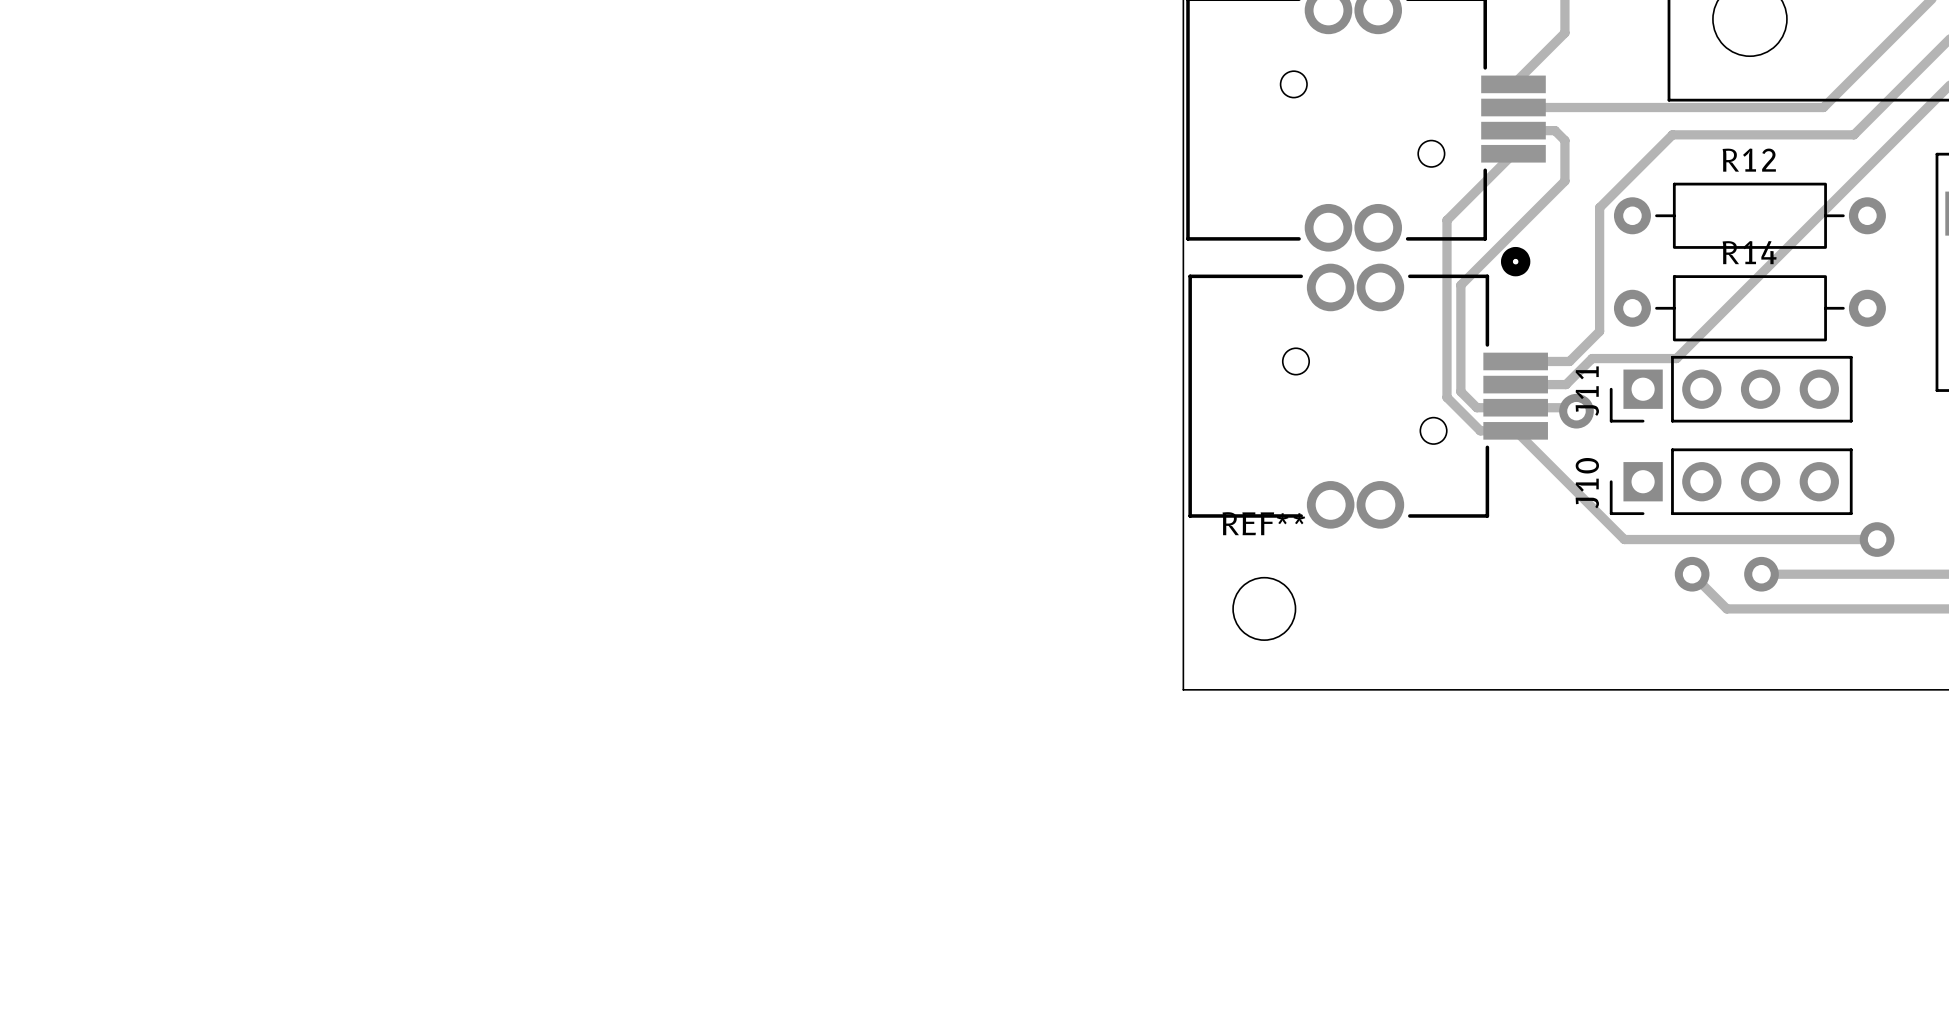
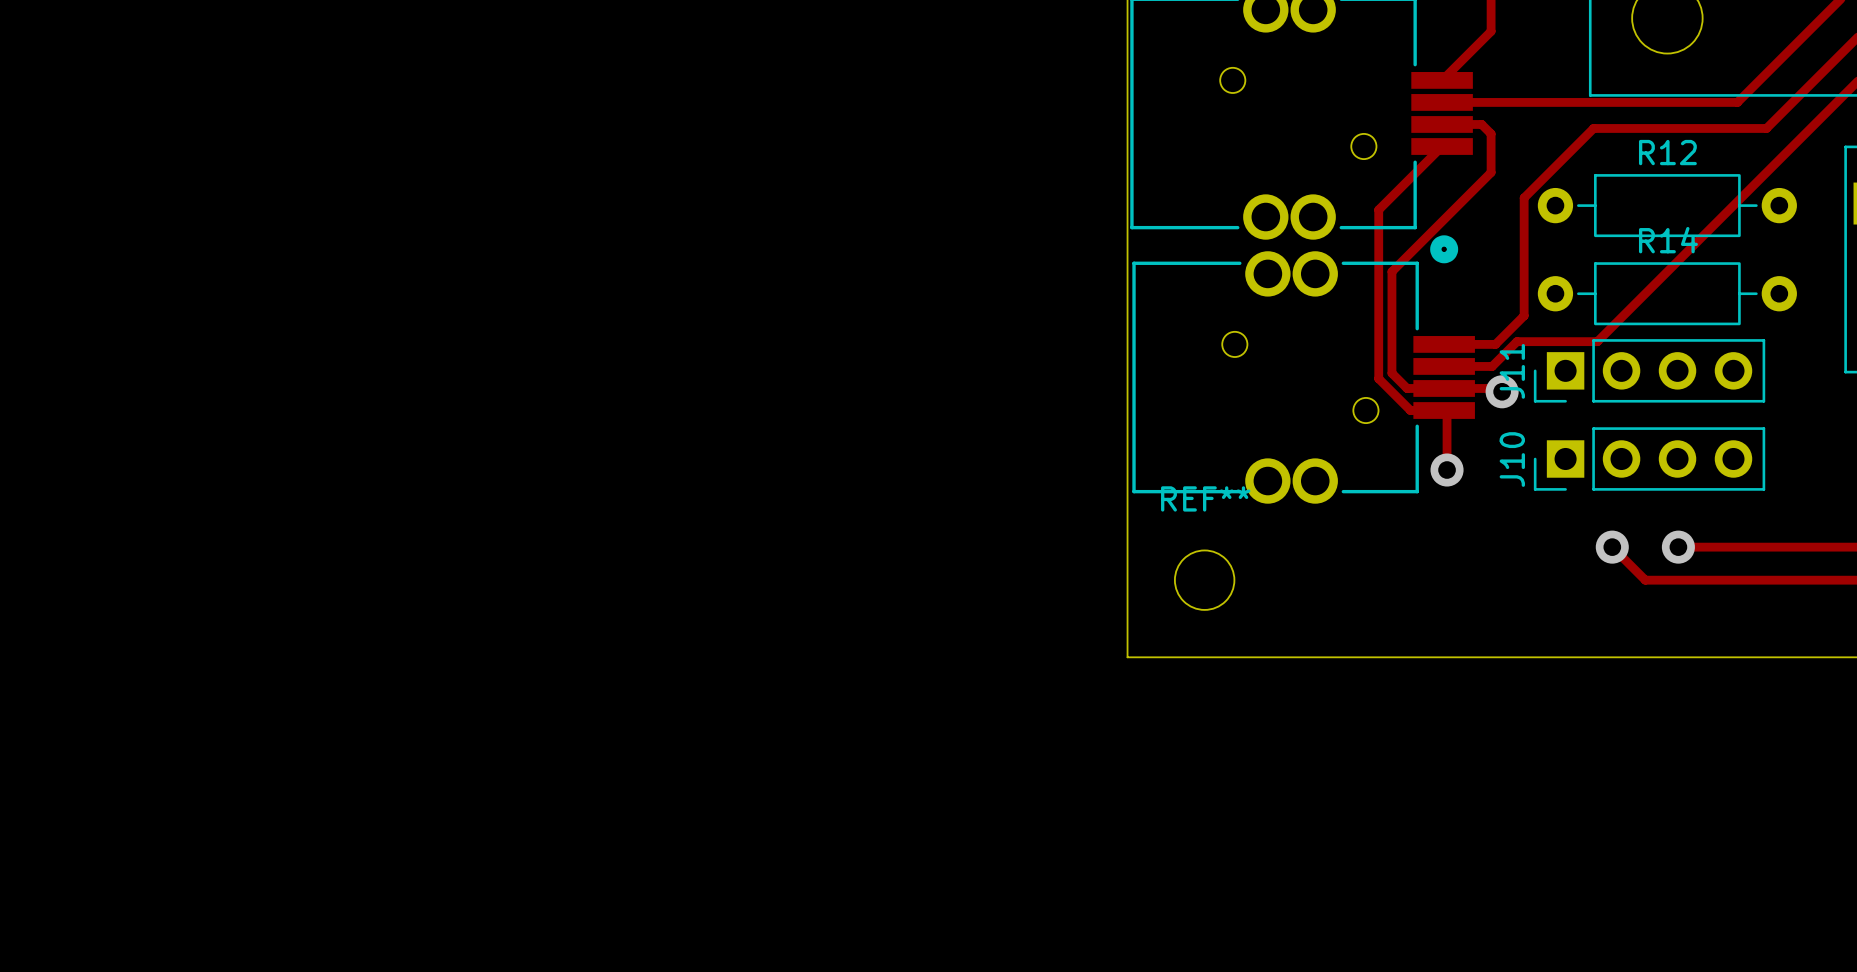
track: (1518, 433) (1624, 539) (1877, 539) -> (1447, 413) (1447, 470)
via: none -> (1447, 470)
via: (1877, 539) -> none

